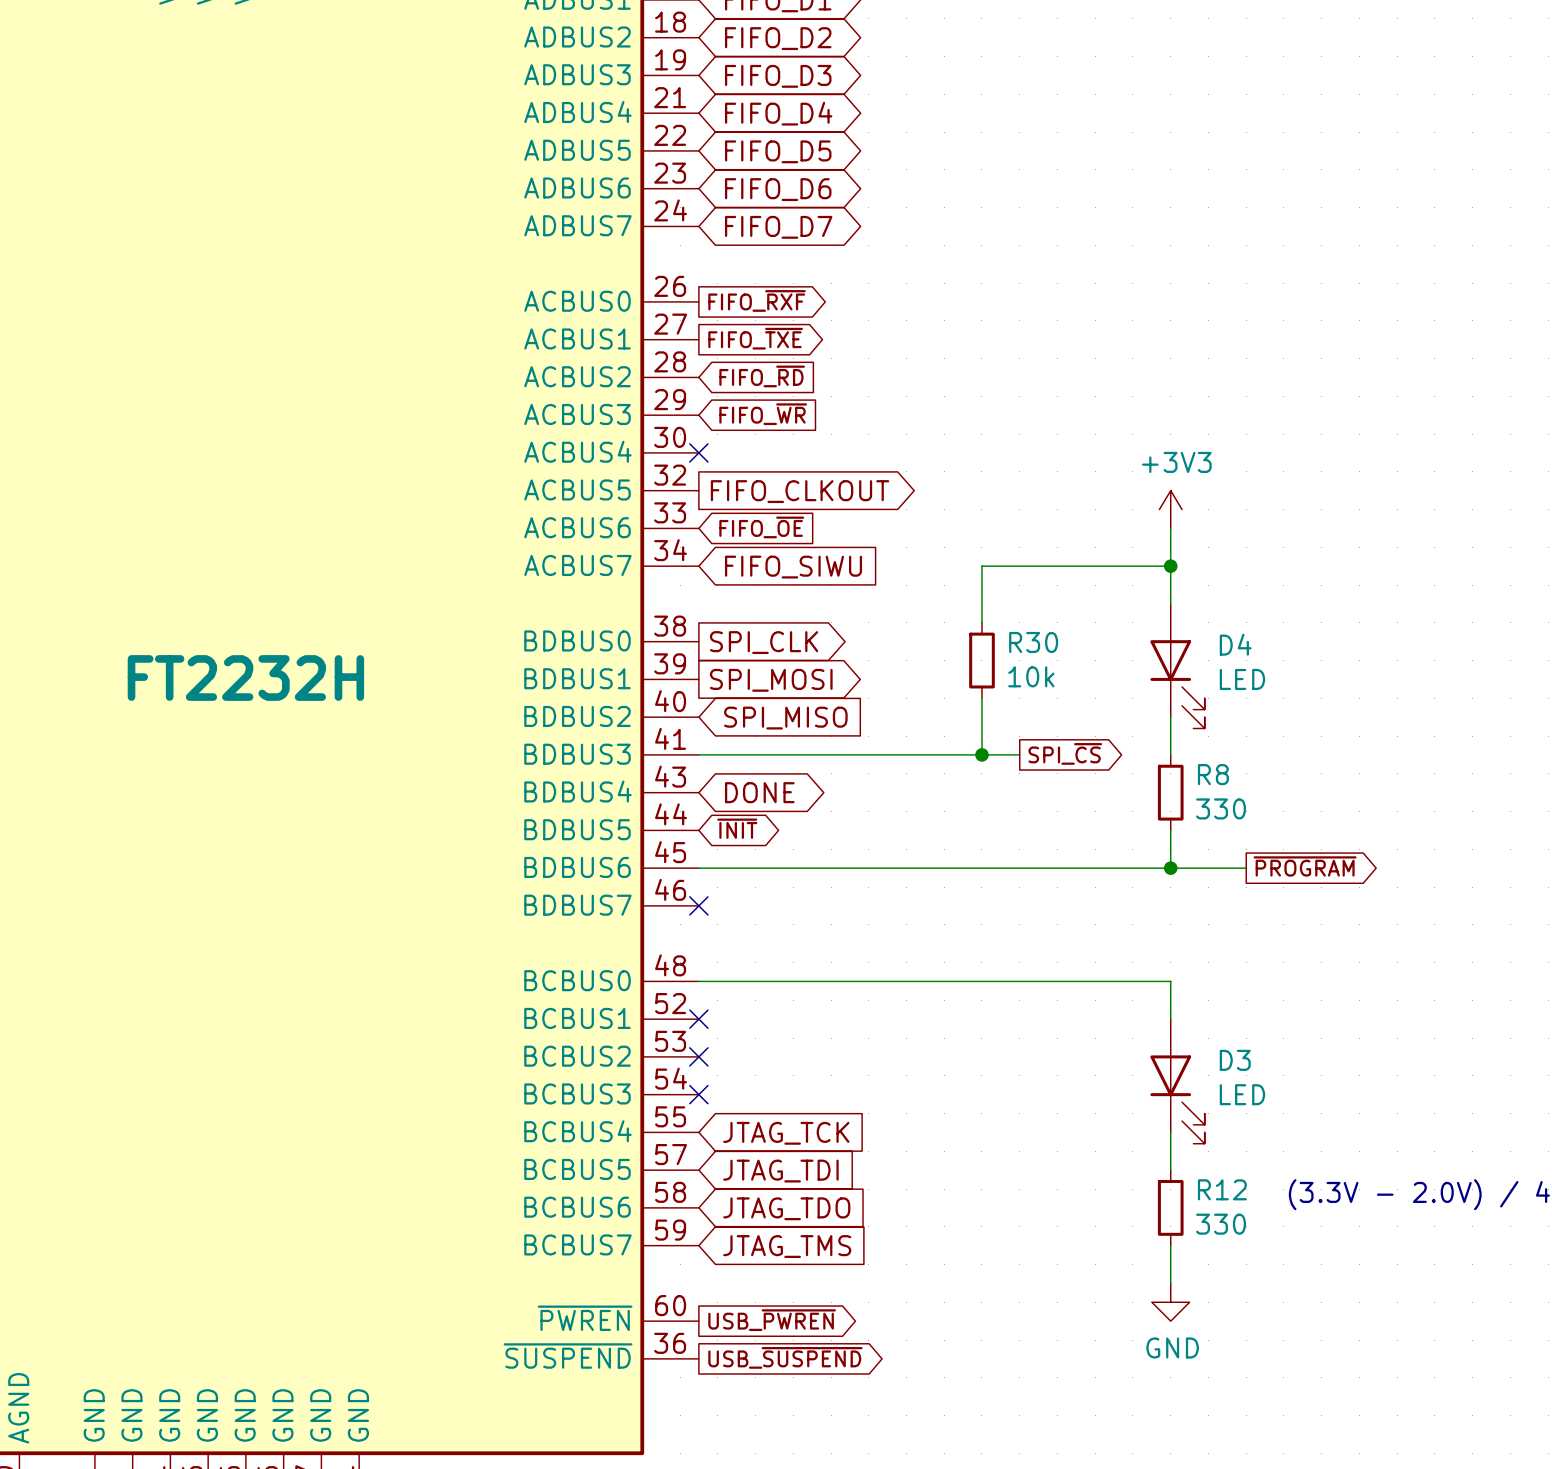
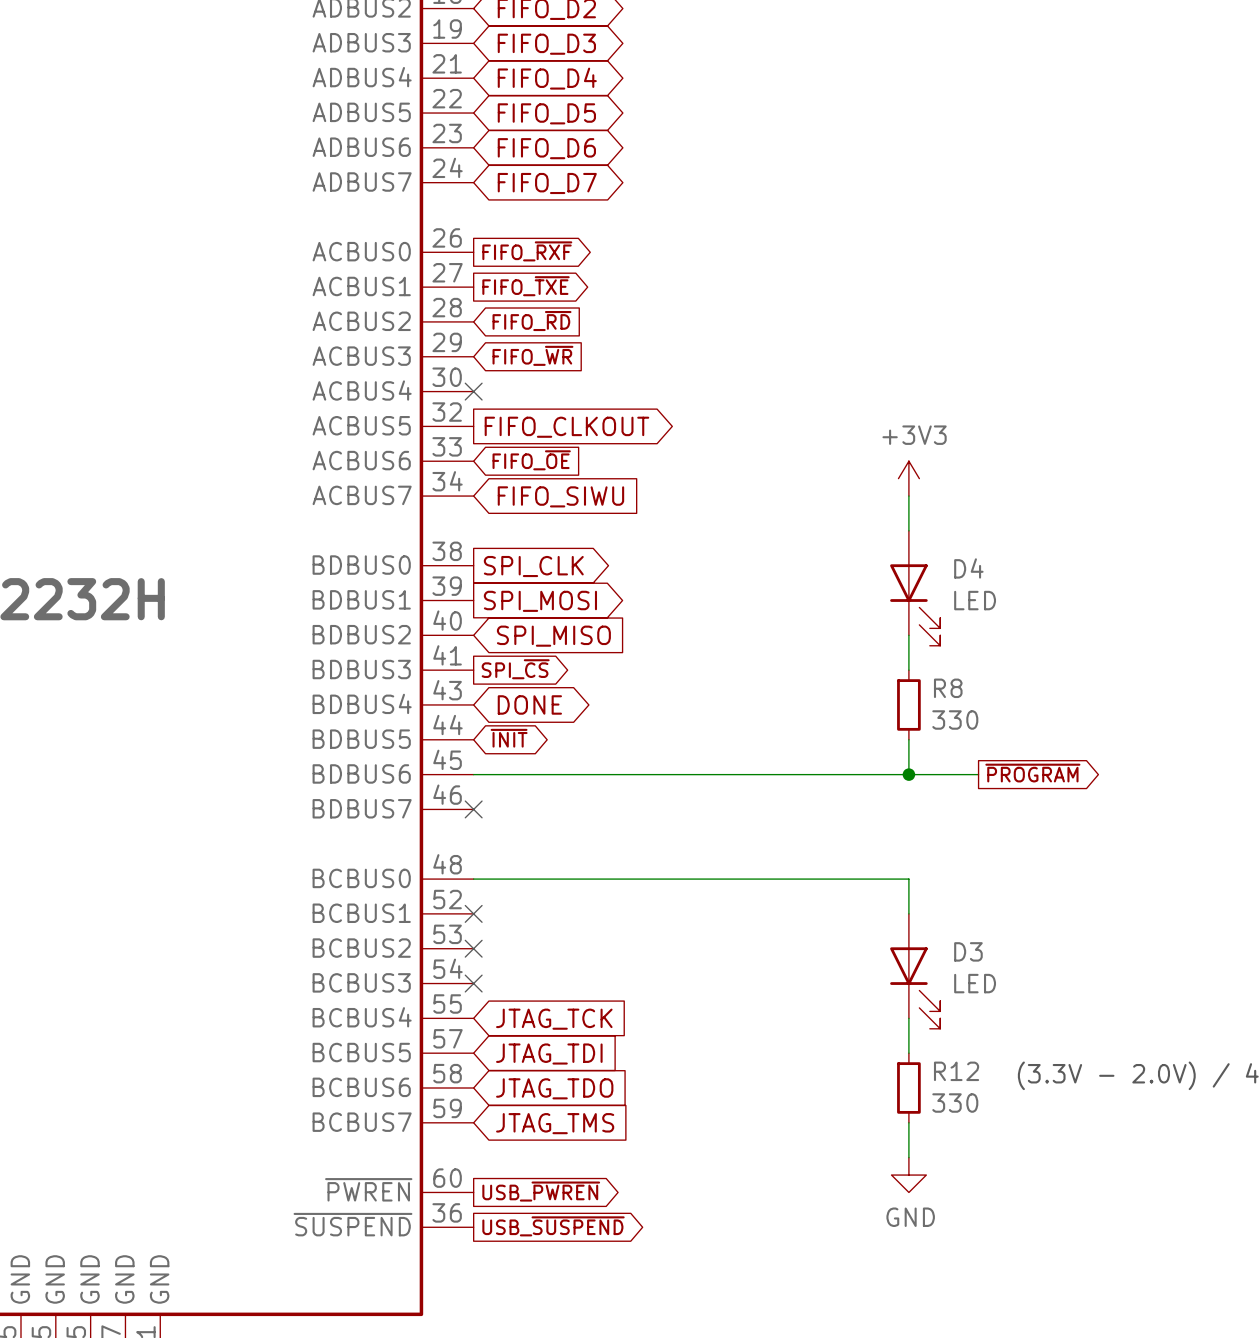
power symbol position: +3V3 (1170, 509) -> +3V3 (908, 478)
wire: (1170, 528) (1170, 566) (981, 566) (981, 622) -> none
junction: (1170, 566) -> none
R30: 10k (981, 660) -> none
wire: (981, 698) (981, 754) -> none
global label position: SPI_~{CS} (1065, 753) -> SPI_~{CS} (515, 669)
wire: (698, 754) (1019, 754) -> none
junction: (981, 754) -> none

